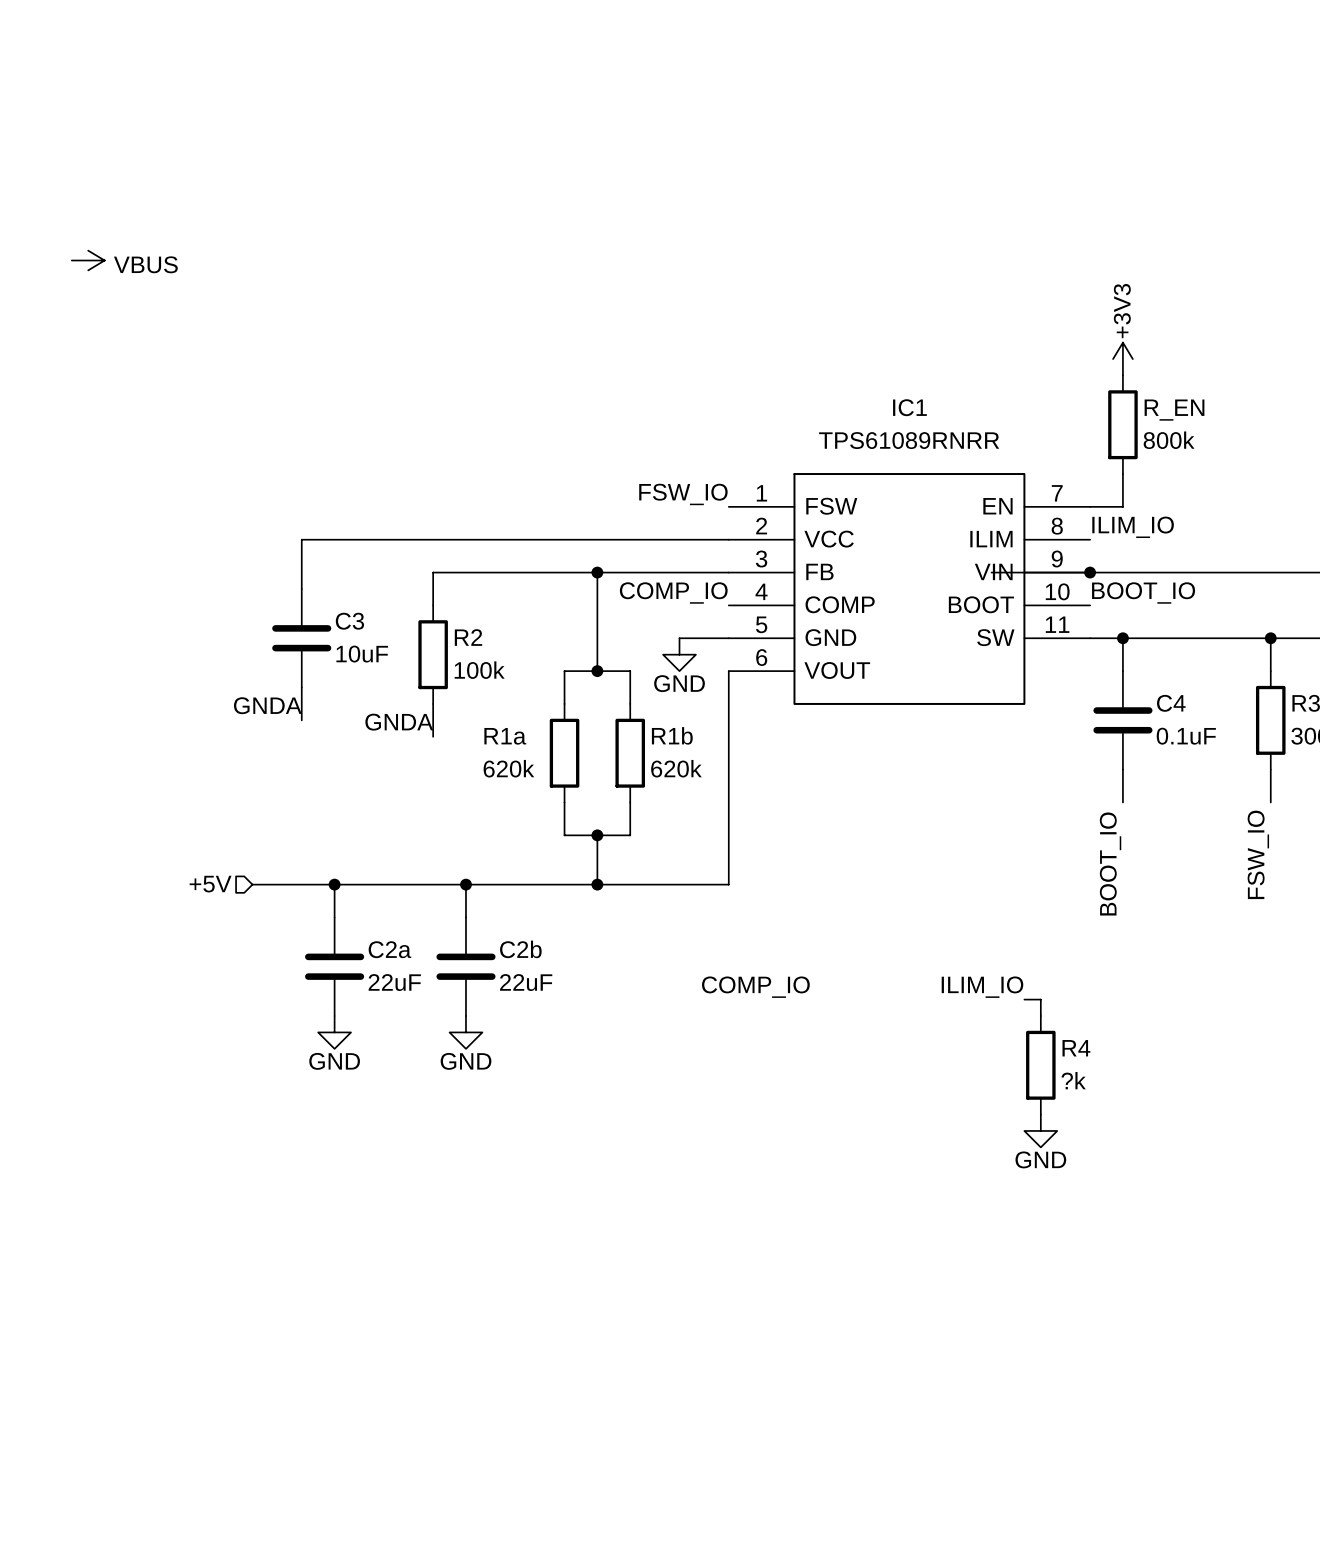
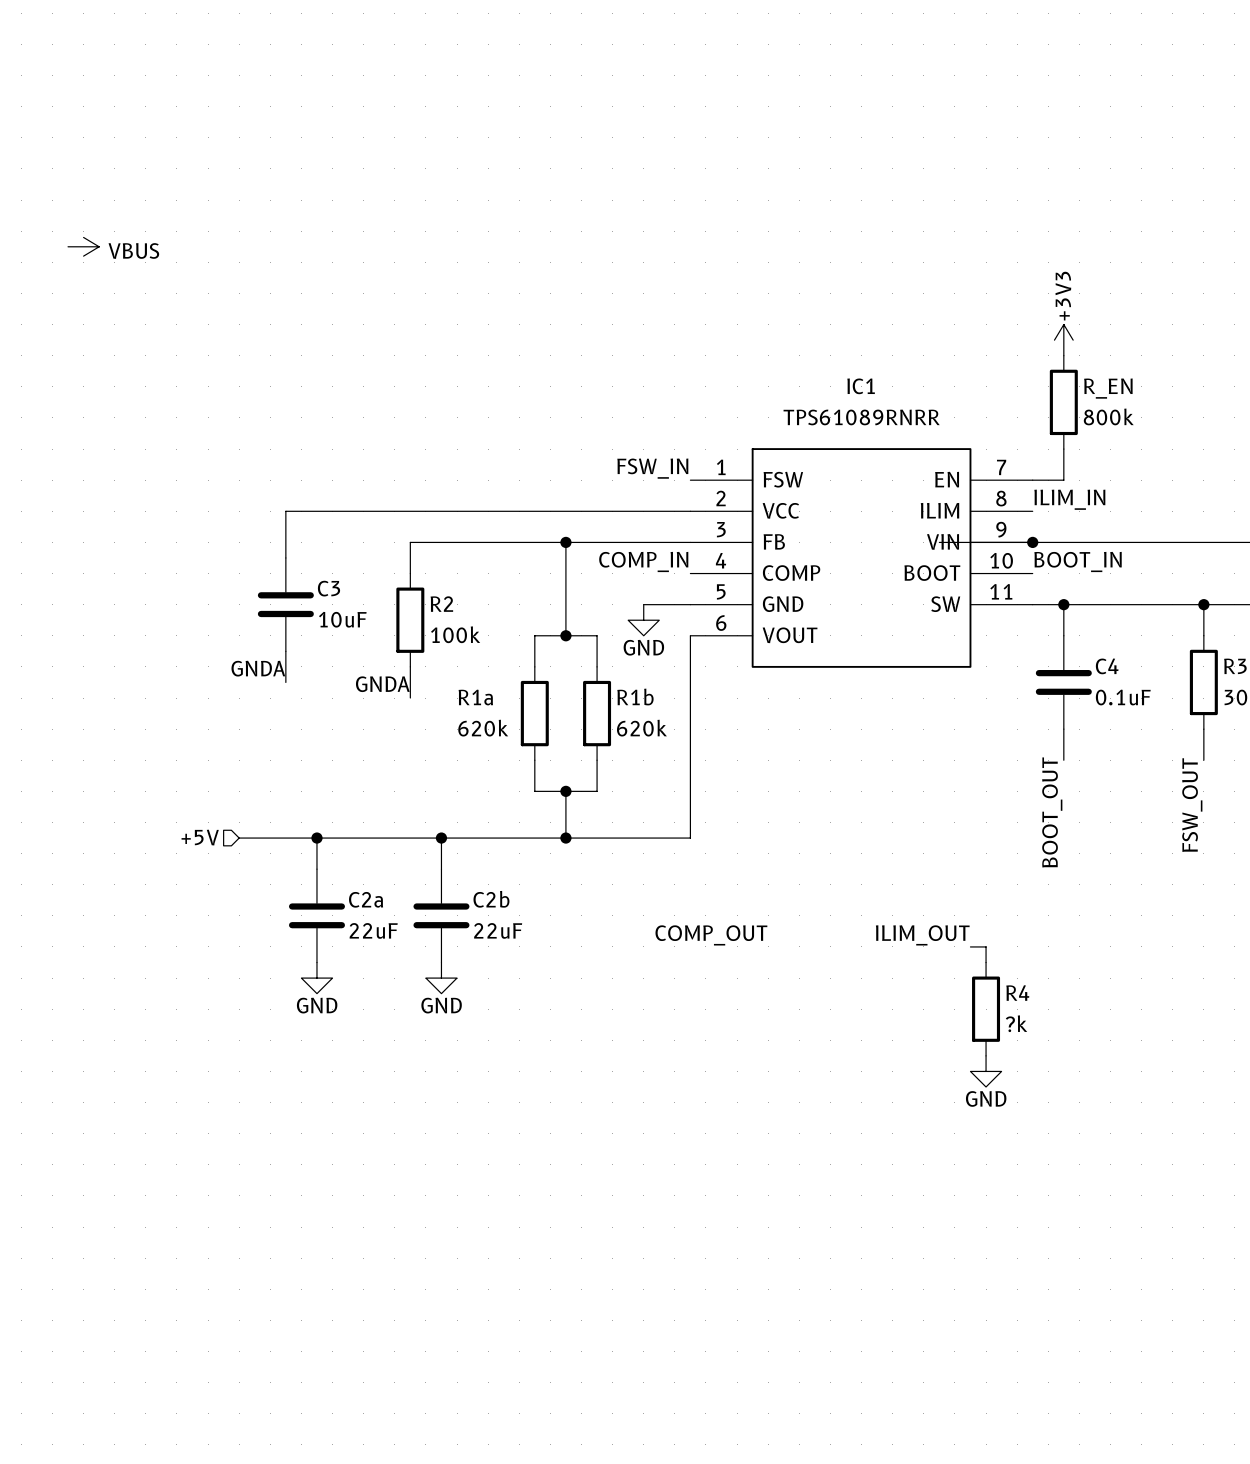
label: FSW_IO (683, 494) -> FSW_IN (652, 468)
label: ILIM_IO (1133, 527) -> ILIM_IN (1069, 499)
label: COMP_IO (673, 593) -> COMP_IN (643, 561)
label: BOOT_IO (1143, 593) -> BOOT_IN (1078, 561)
label: FSW_IO (1258, 854) -> FSW_OUT (1192, 805)
label: BOOT_IO (1110, 863) -> BOOT_OUT (1052, 812)
label: COMP_IO (755, 987) -> COMP_OUT (711, 935)
label: ILIM_IO (982, 987) -> ILIM_OUT (922, 935)

